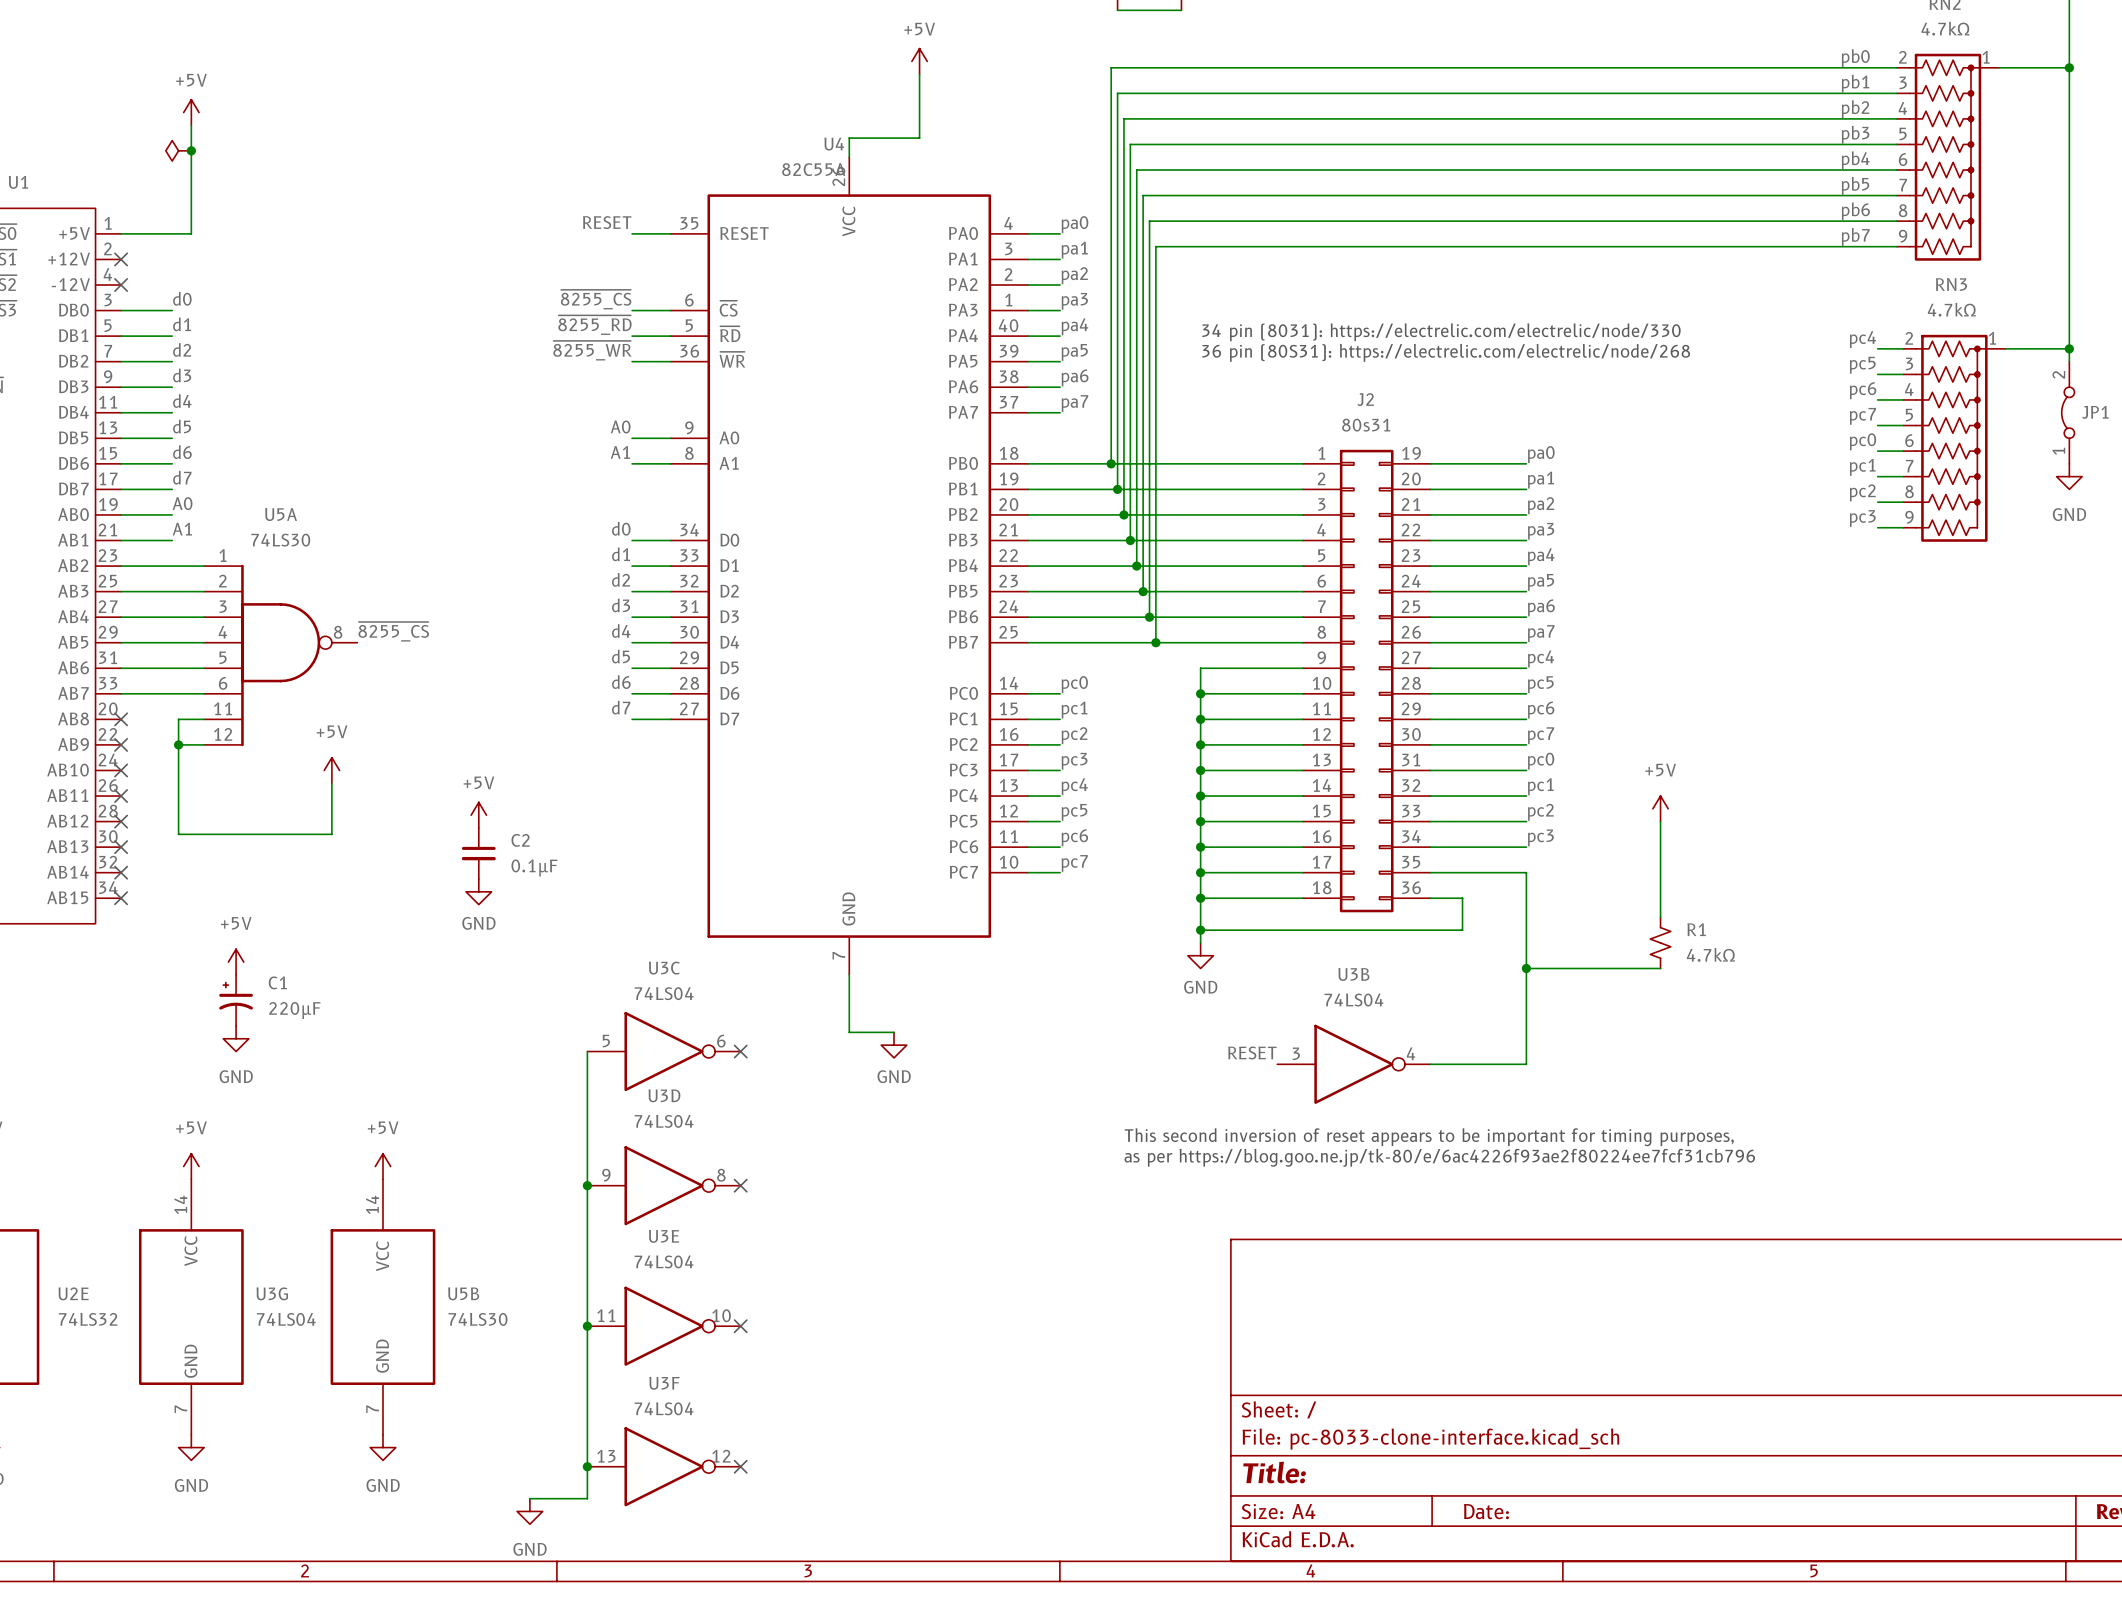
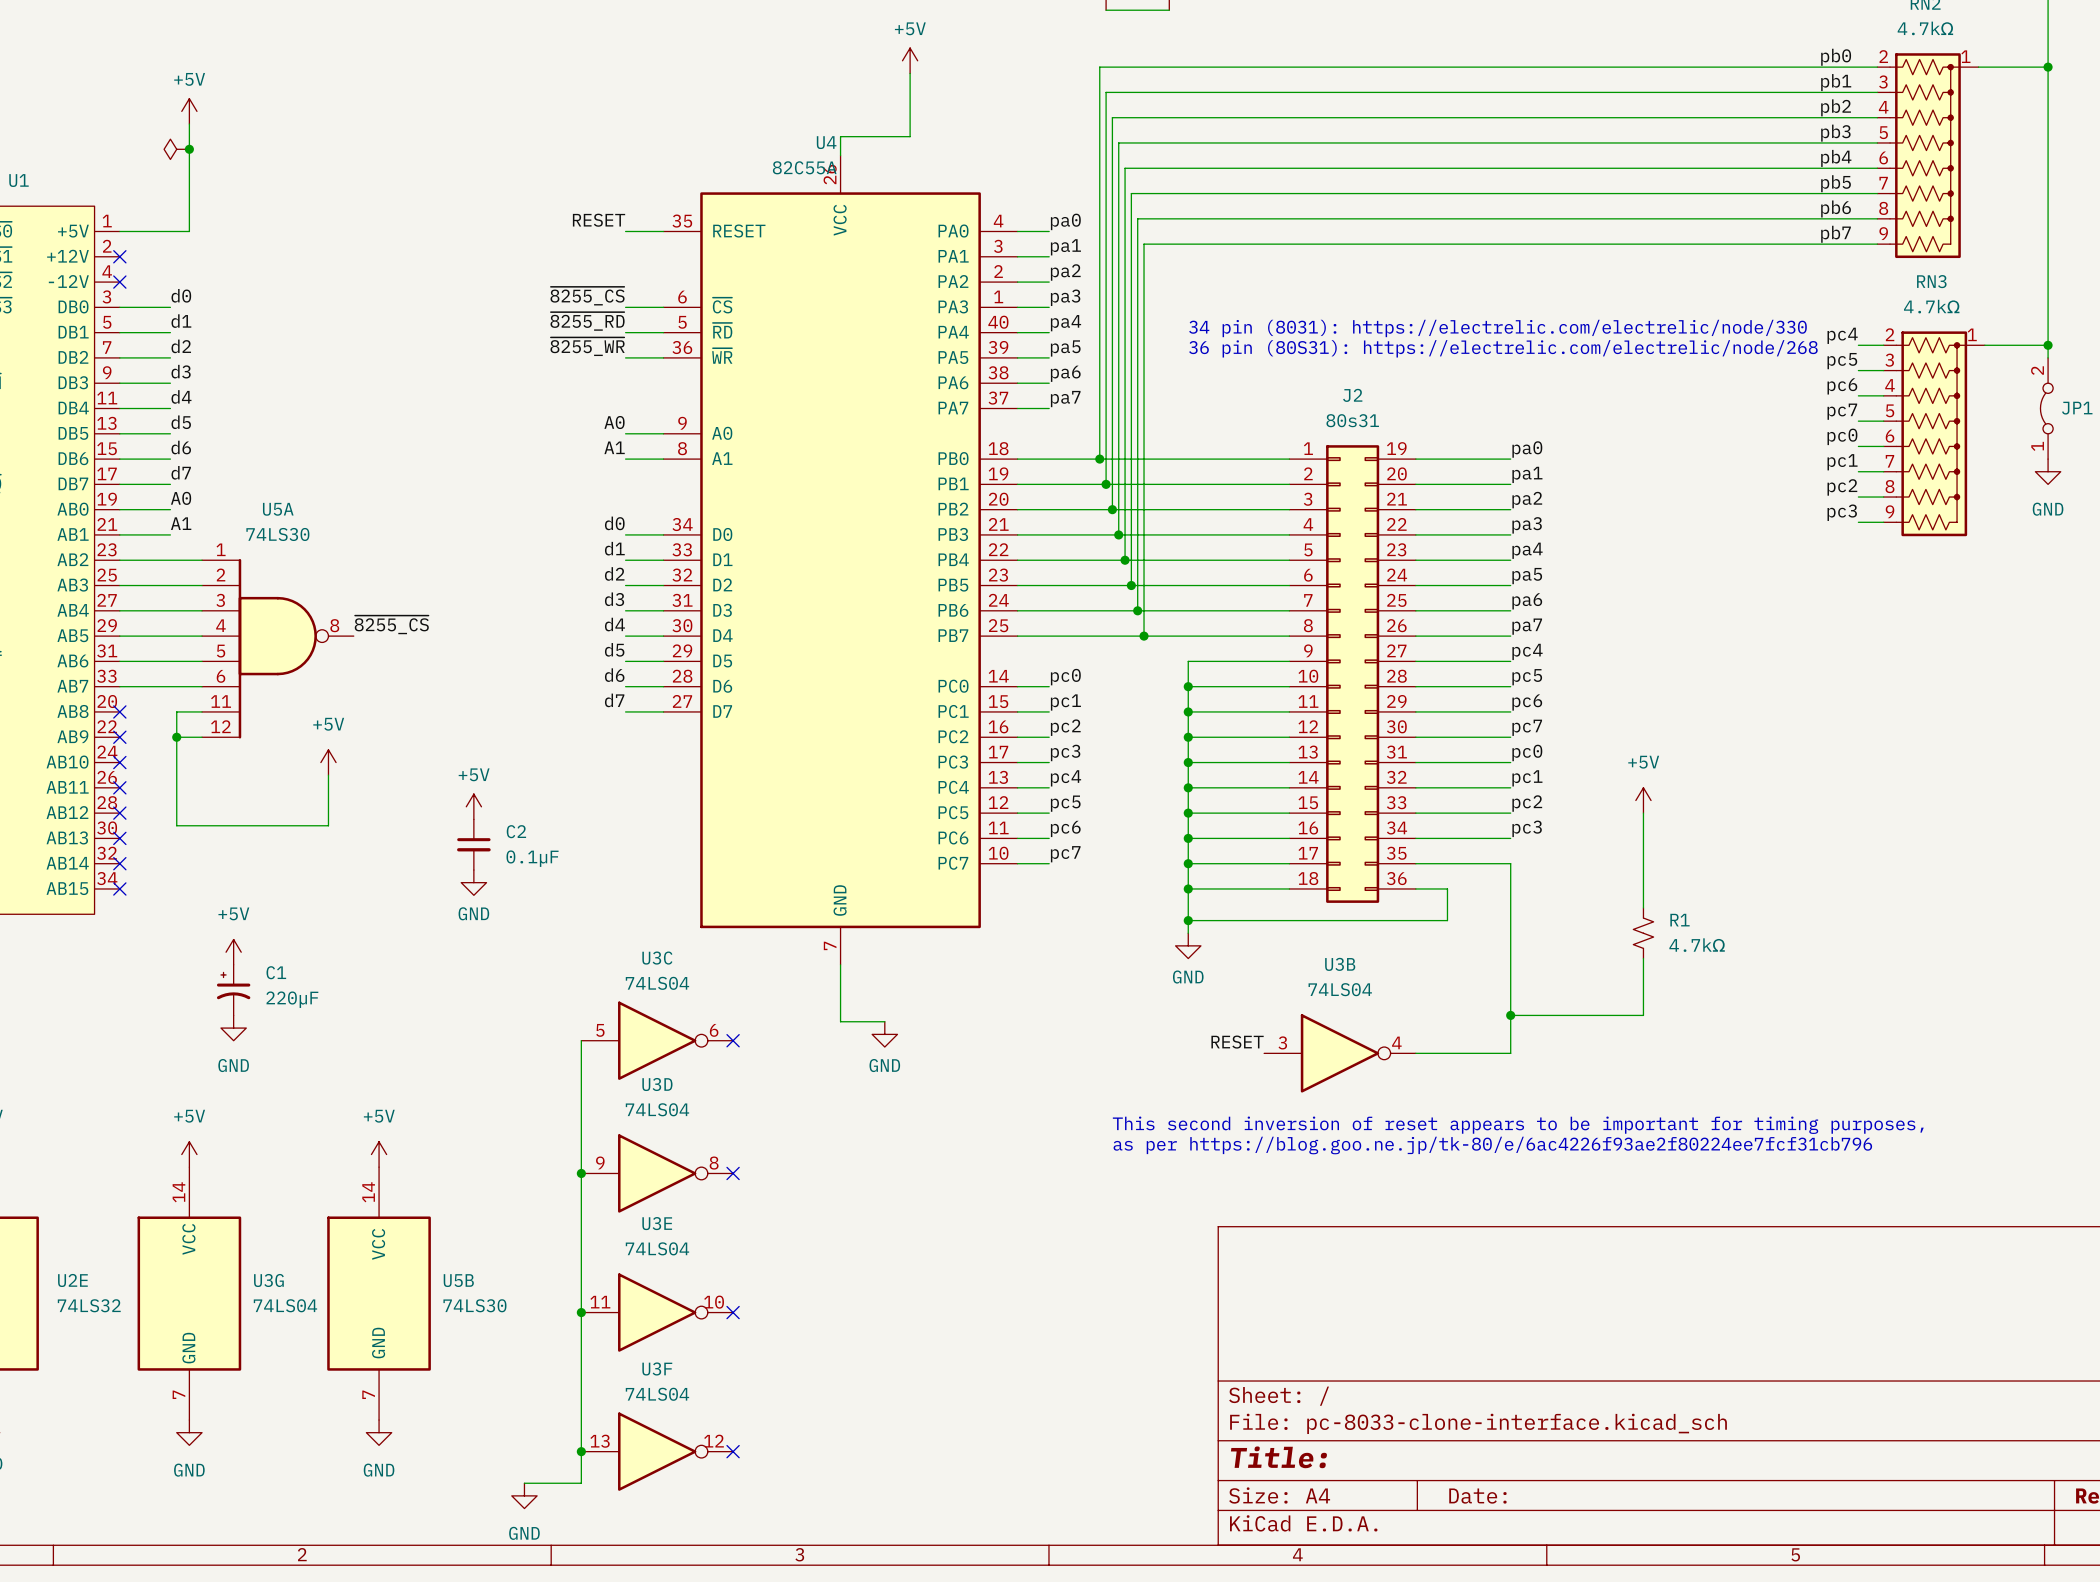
wire: (1526, 968) (1660, 968) -> (1510, 1015) (1643, 1015) (1643, 958)
junction position: (1526, 968) -> (1510, 1015)

